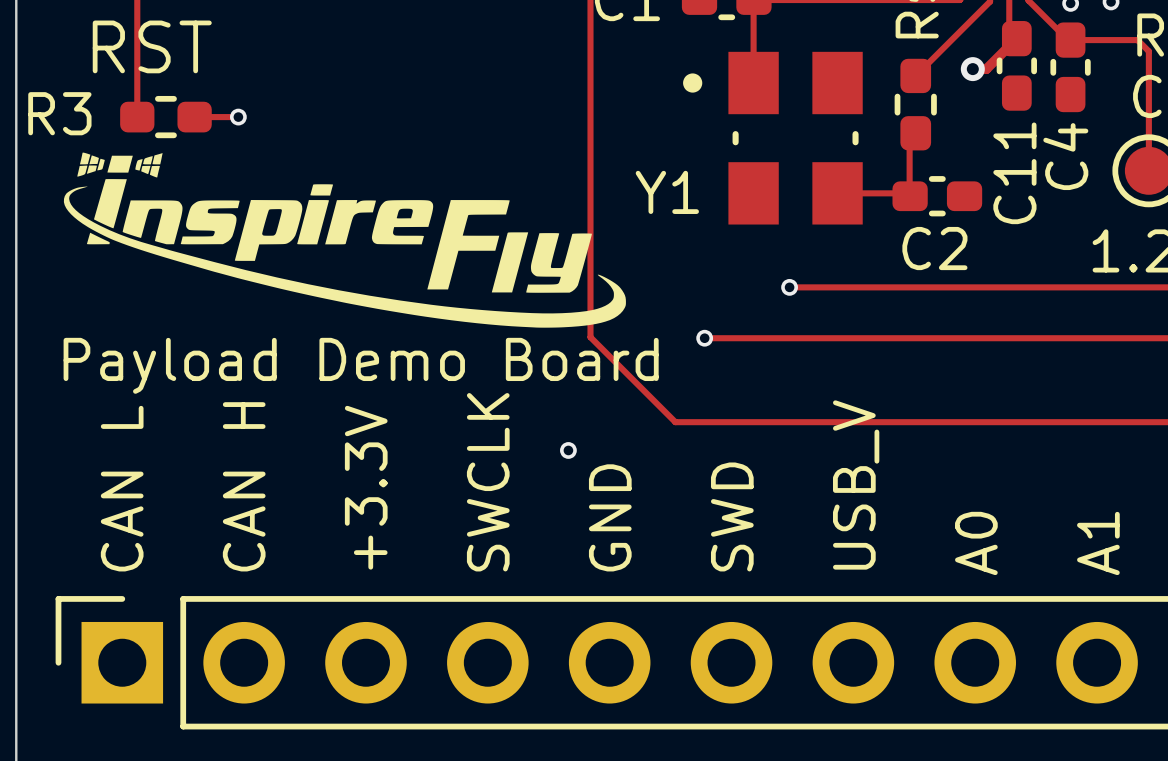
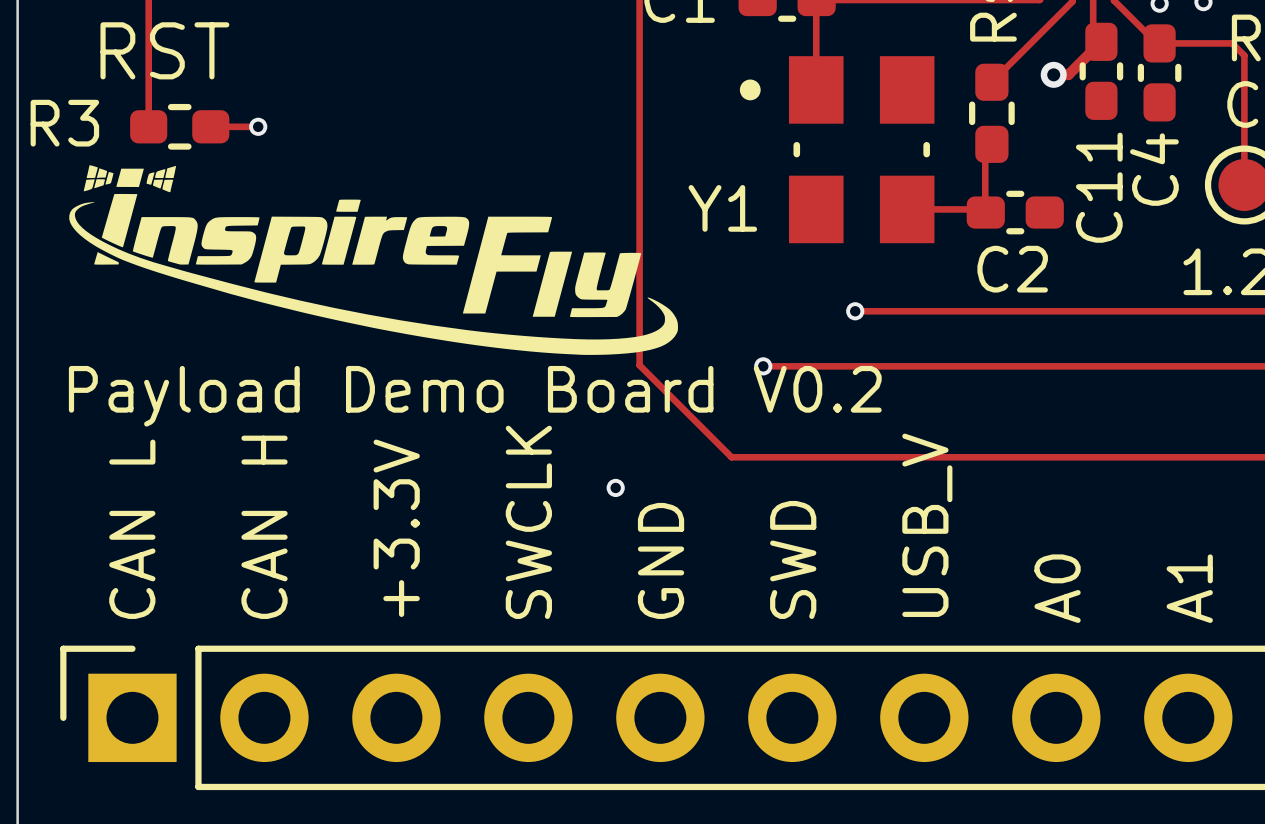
text: Payload Demo Board (361, 365) -> Payload Demo Board V0.2 (475, 396)

